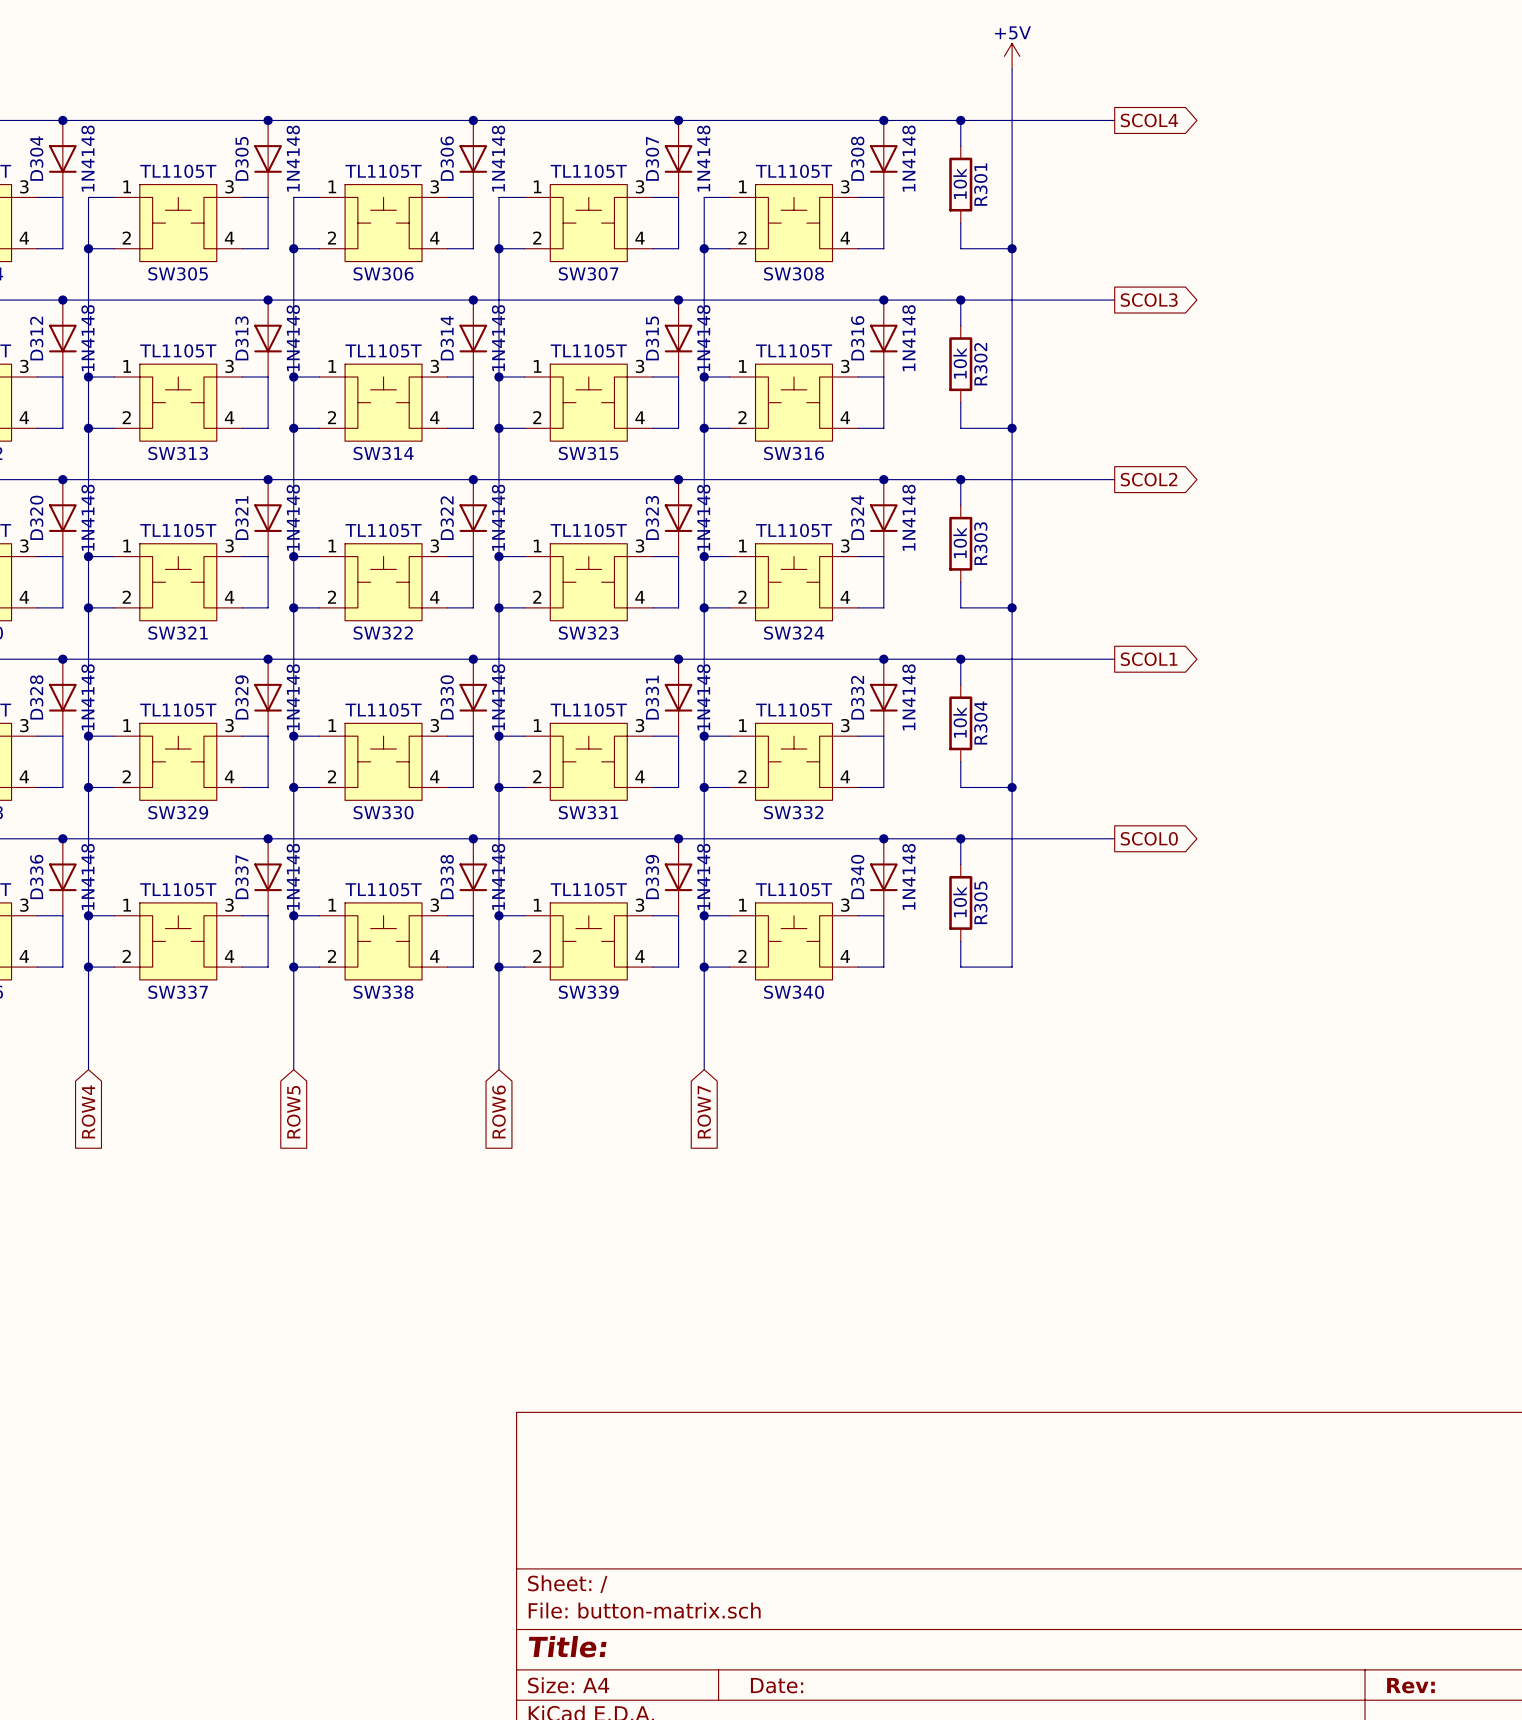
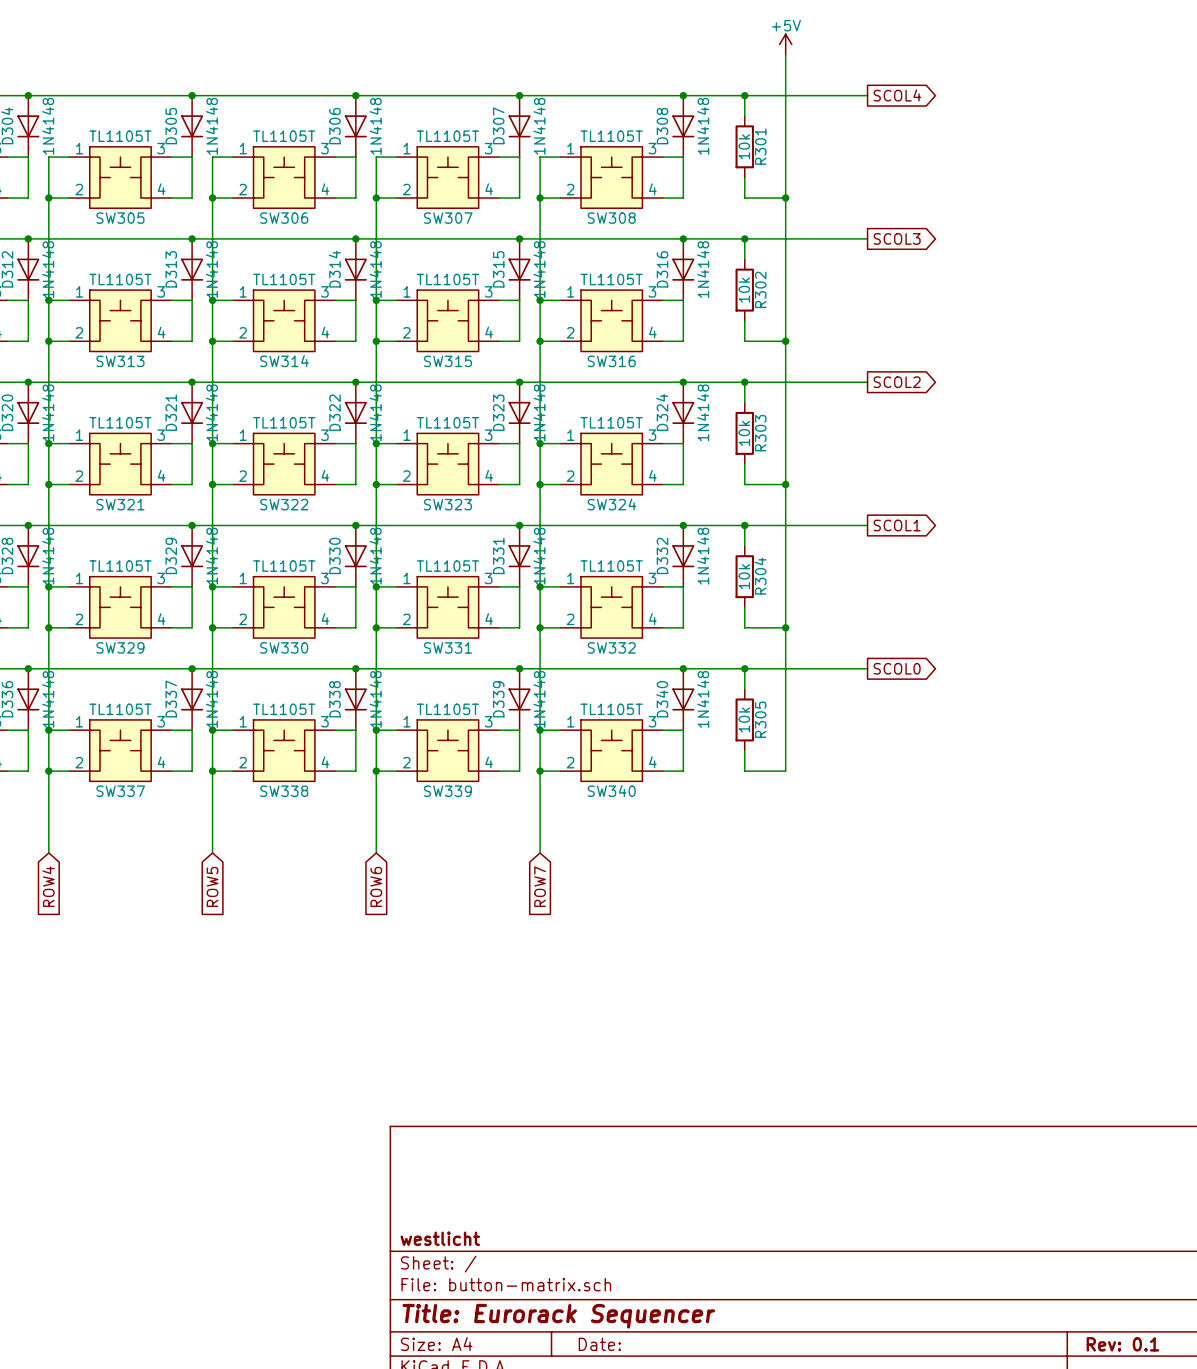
title block: none -> westlicht (440, 1238)
title block: Title: (567, 1646) -> Title: Eurorack Sequencer (558, 1316)
title block: Rev: (1410, 1685) -> Rev: 0.1 (1122, 1344)

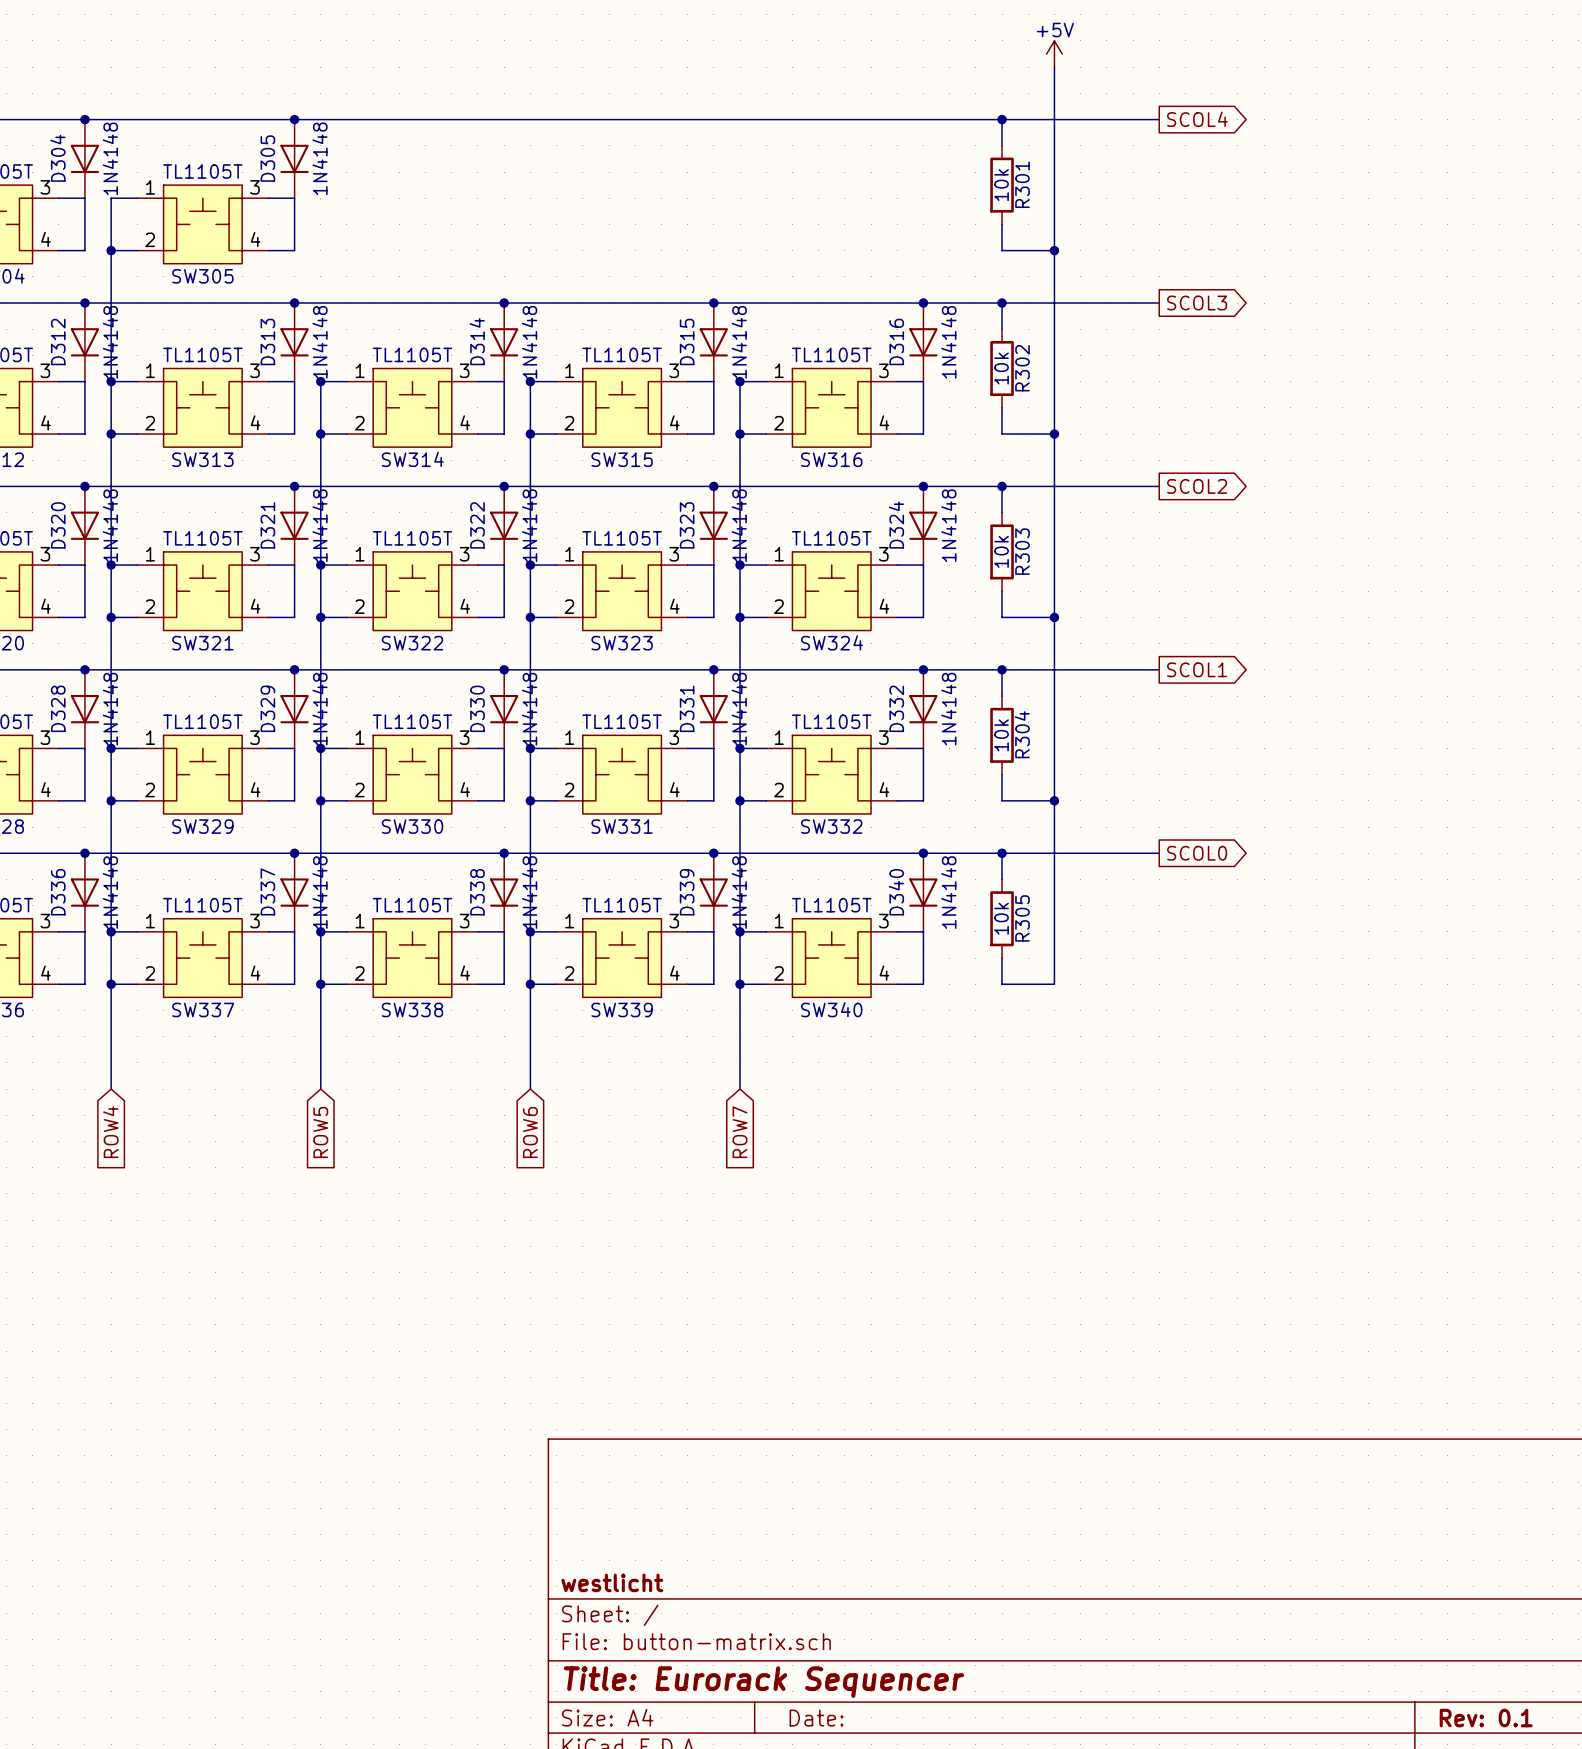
junction: (355, 95) -> none
junction: (519, 95) -> none
junction: (683, 95) -> none
D306: 1N4148 (355, 126) -> none
D307: 1N4148 (519, 126) -> none
D308: 1N4148 (683, 126) -> none
wire: (233, 157) (212, 157) (212, 300) -> none
wire: (335, 157) (355, 157) (355, 197) (335, 197) -> none
wire: (396, 157) (376, 157) (376, 300) -> none
wire: (499, 157) (519, 157) (519, 197) (499, 197) -> none
wire: (560, 157) (540, 157) (540, 300) -> none
wire: (662, 157) (683, 157) (683, 197) (662, 197) -> none
SW306: TL1105T (284, 177) -> none
SW307: TL1105T (447, 177) -> none
SW308: TL1105T (611, 177) -> none
wire: (212, 197) (233, 197) -> none
junction: (212, 197) -> none
wire: (376, 197) (396, 197) -> none
junction: (376, 197) -> none
wire: (540, 197) (560, 197) -> none
junction: (540, 197) -> none

